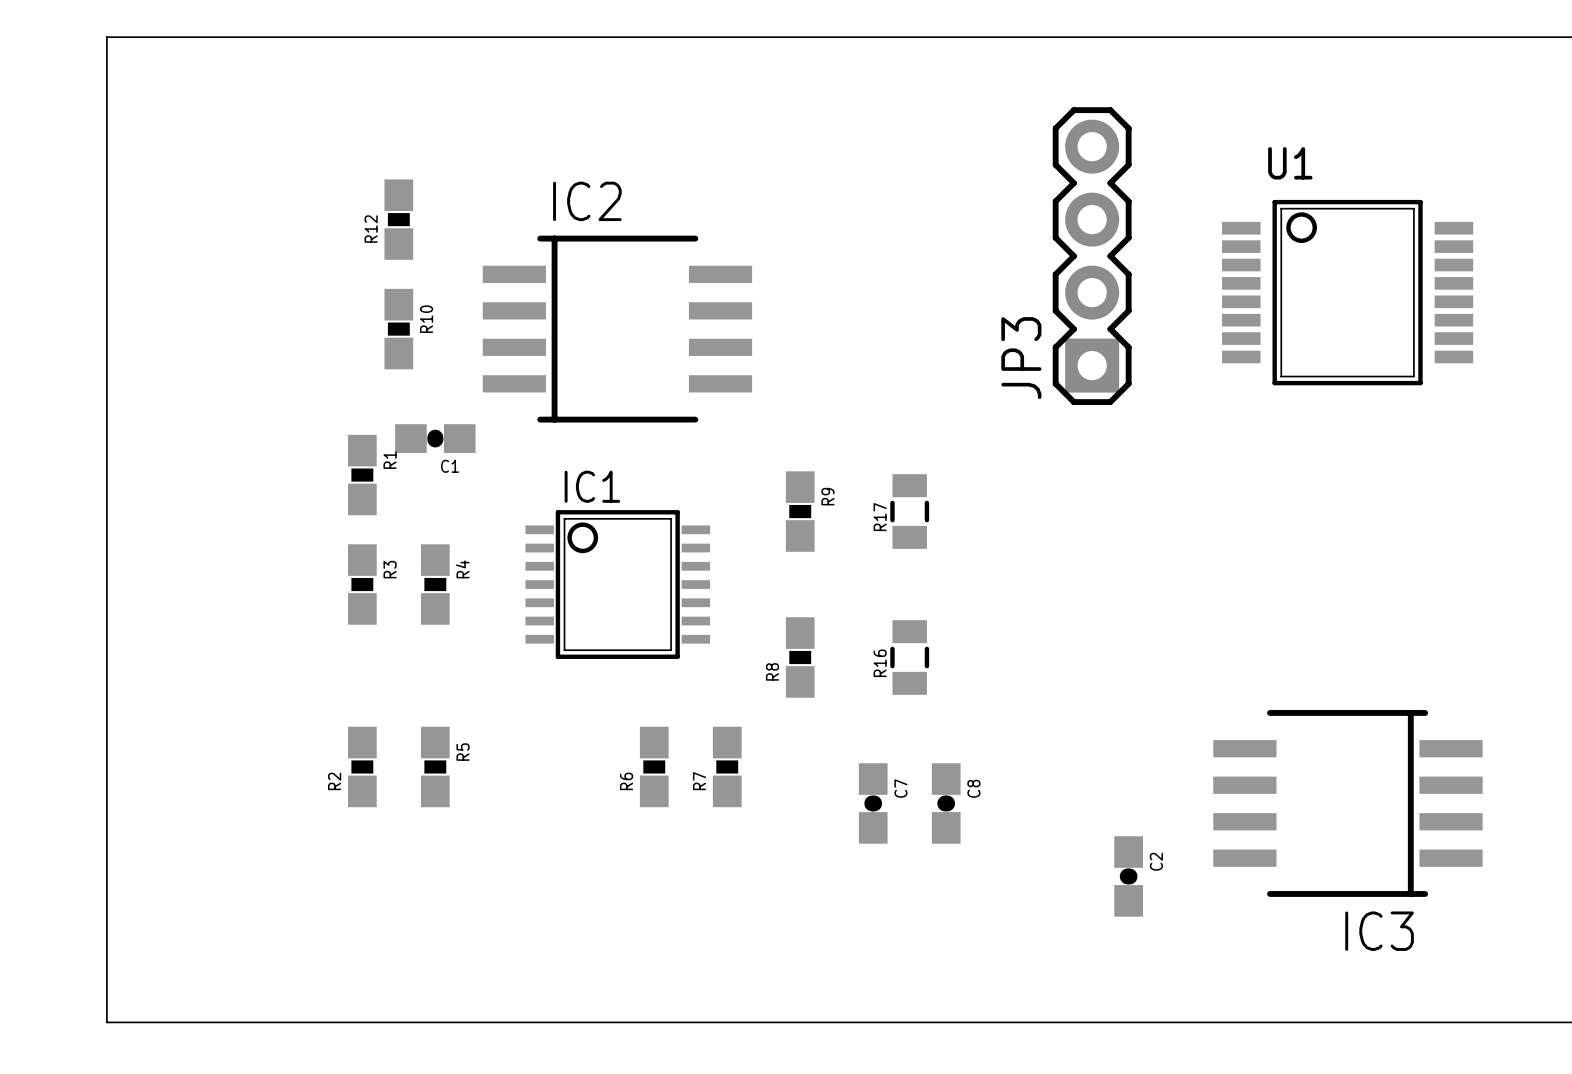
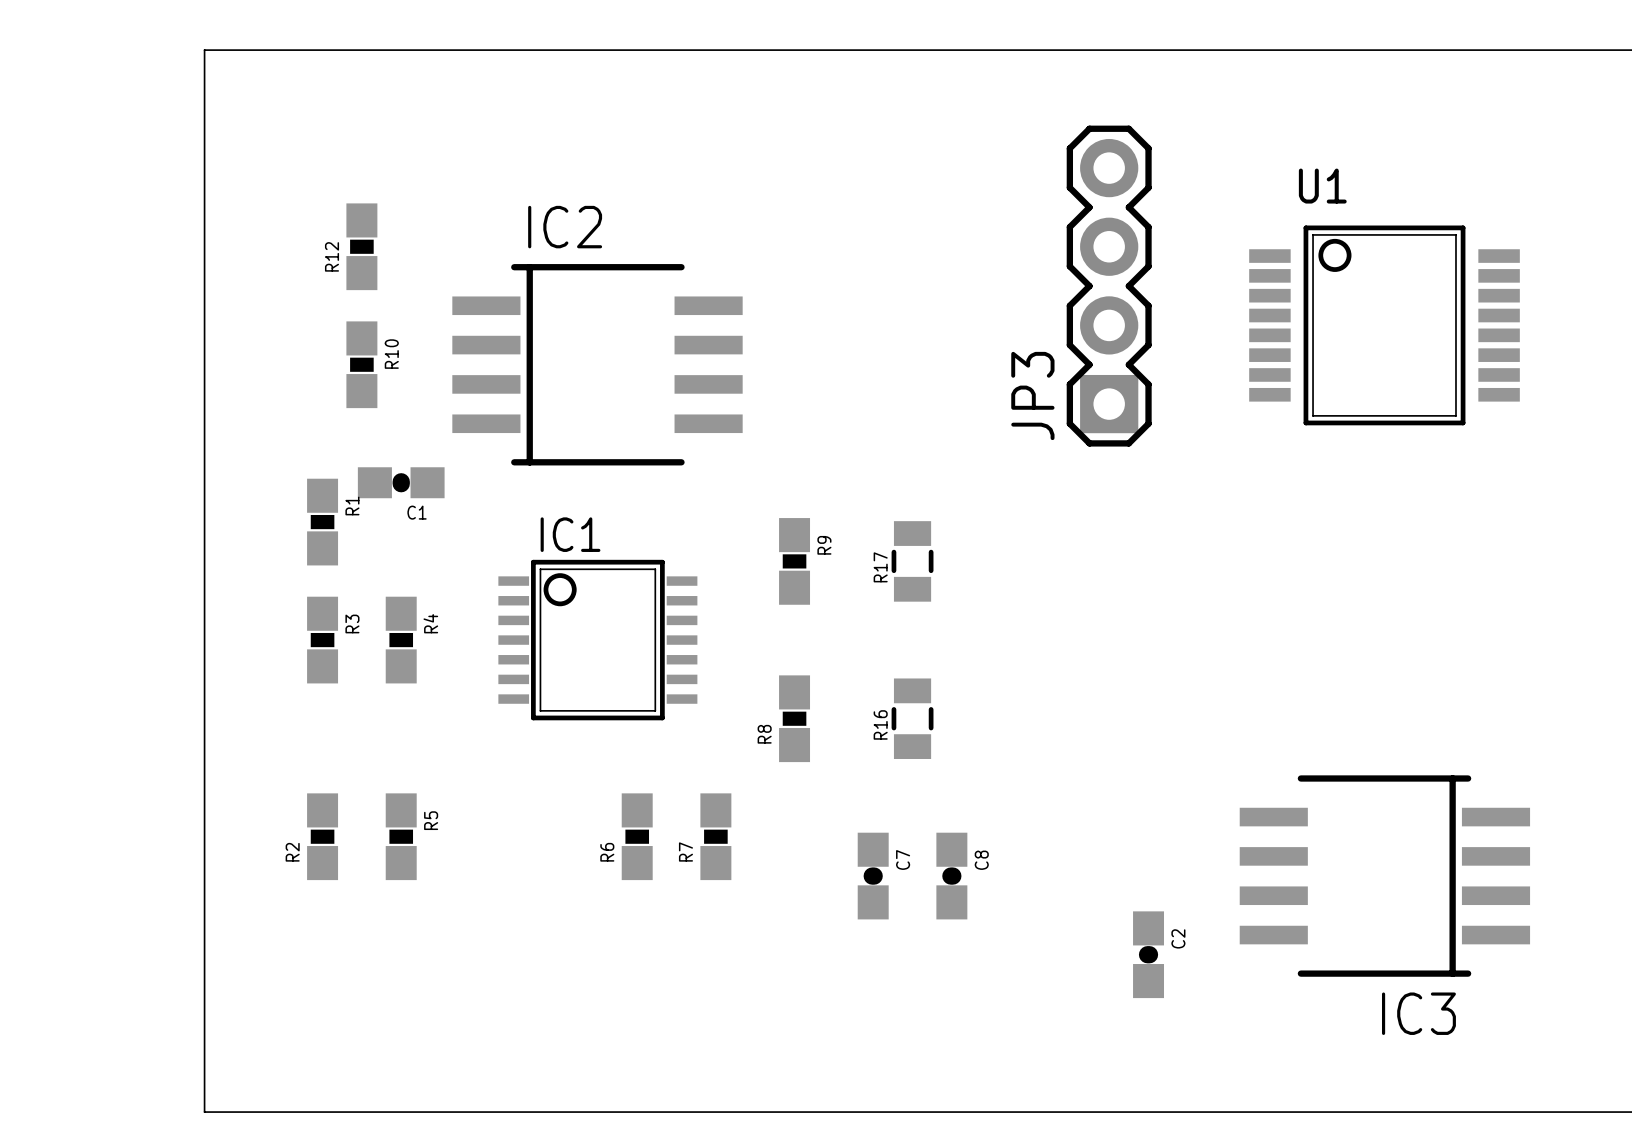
board edge: (252, 37) (106, 37) (106, 1022) (252, 1022) -> (204, 50) (204, 1112)

